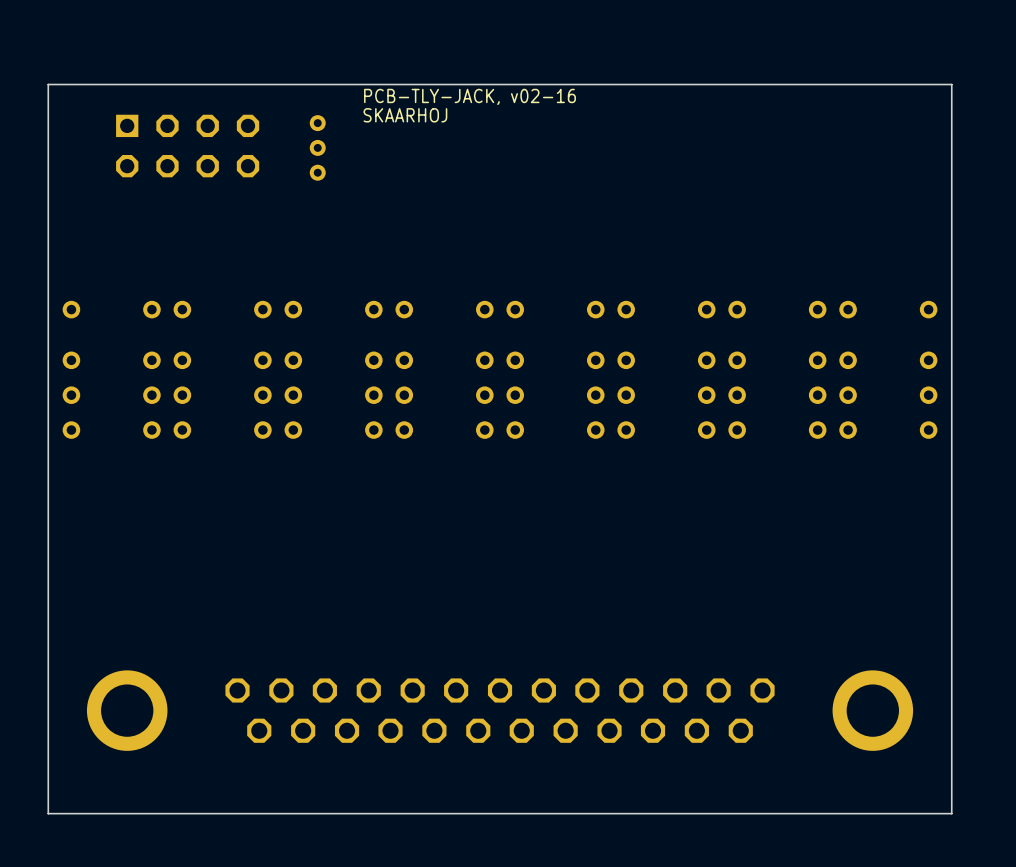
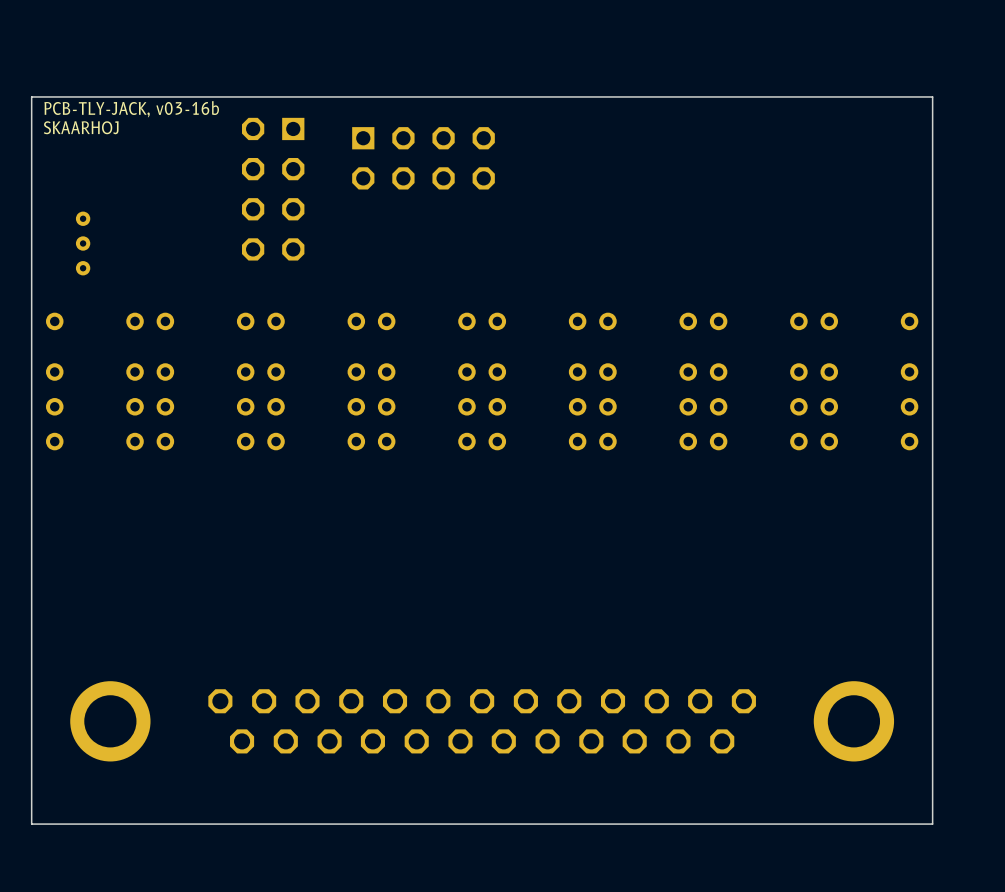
text: none -> PCB-TLY-JACK, v03-16b (131, 109)
text: PCB-TLY-JACK, v02-16 (470, 96) -> none
text position: SKAARHOJ (405, 115) -> SKAARHOJ (81, 127)
part rotation: 0° (187, 146) -> 90° clockwise (273, 189)
part position: (187, 146) -> (273, 189)
part: none -> (423, 158)
part: (317, 147) -> none
part: none -> (83, 243)

